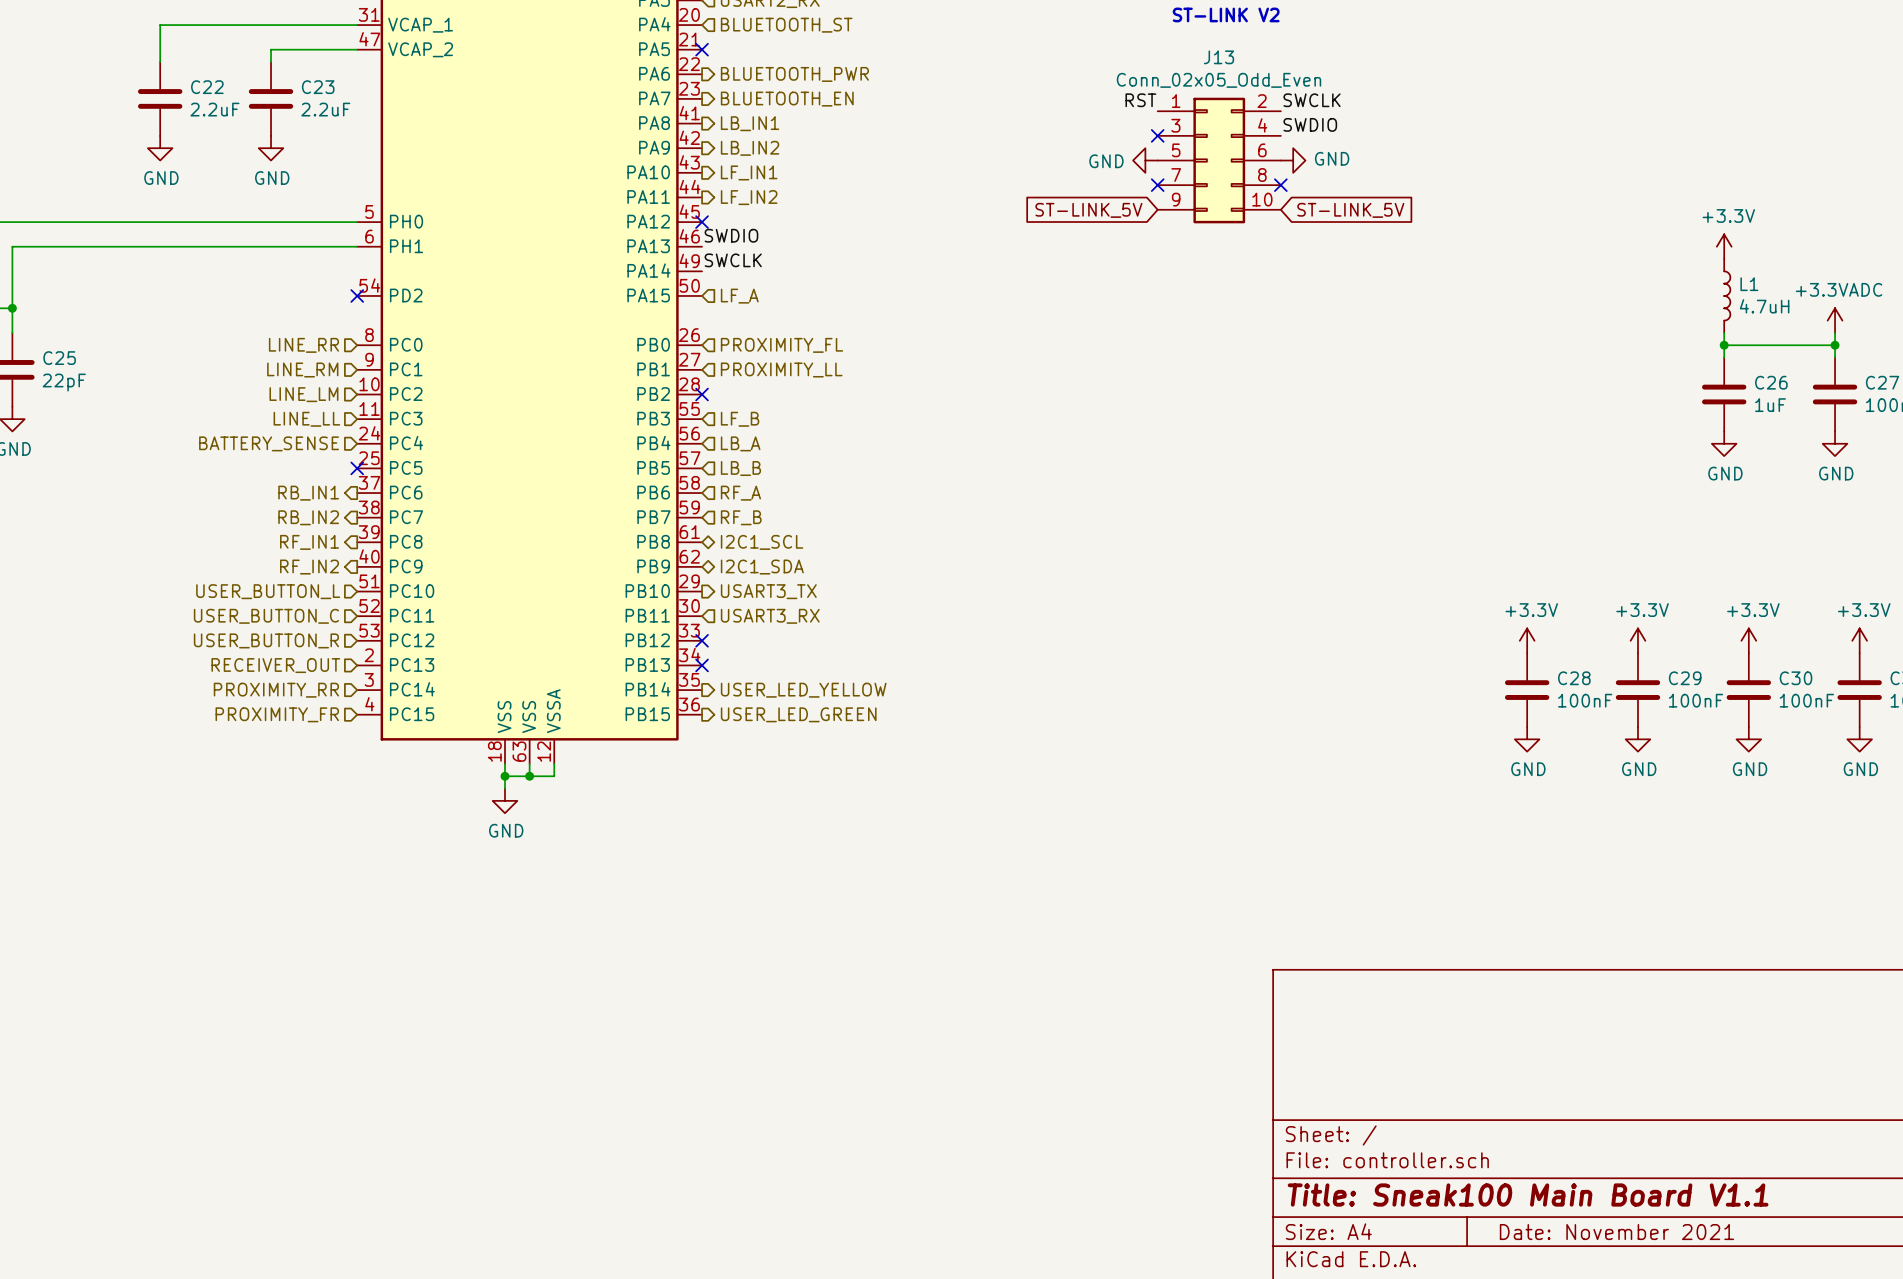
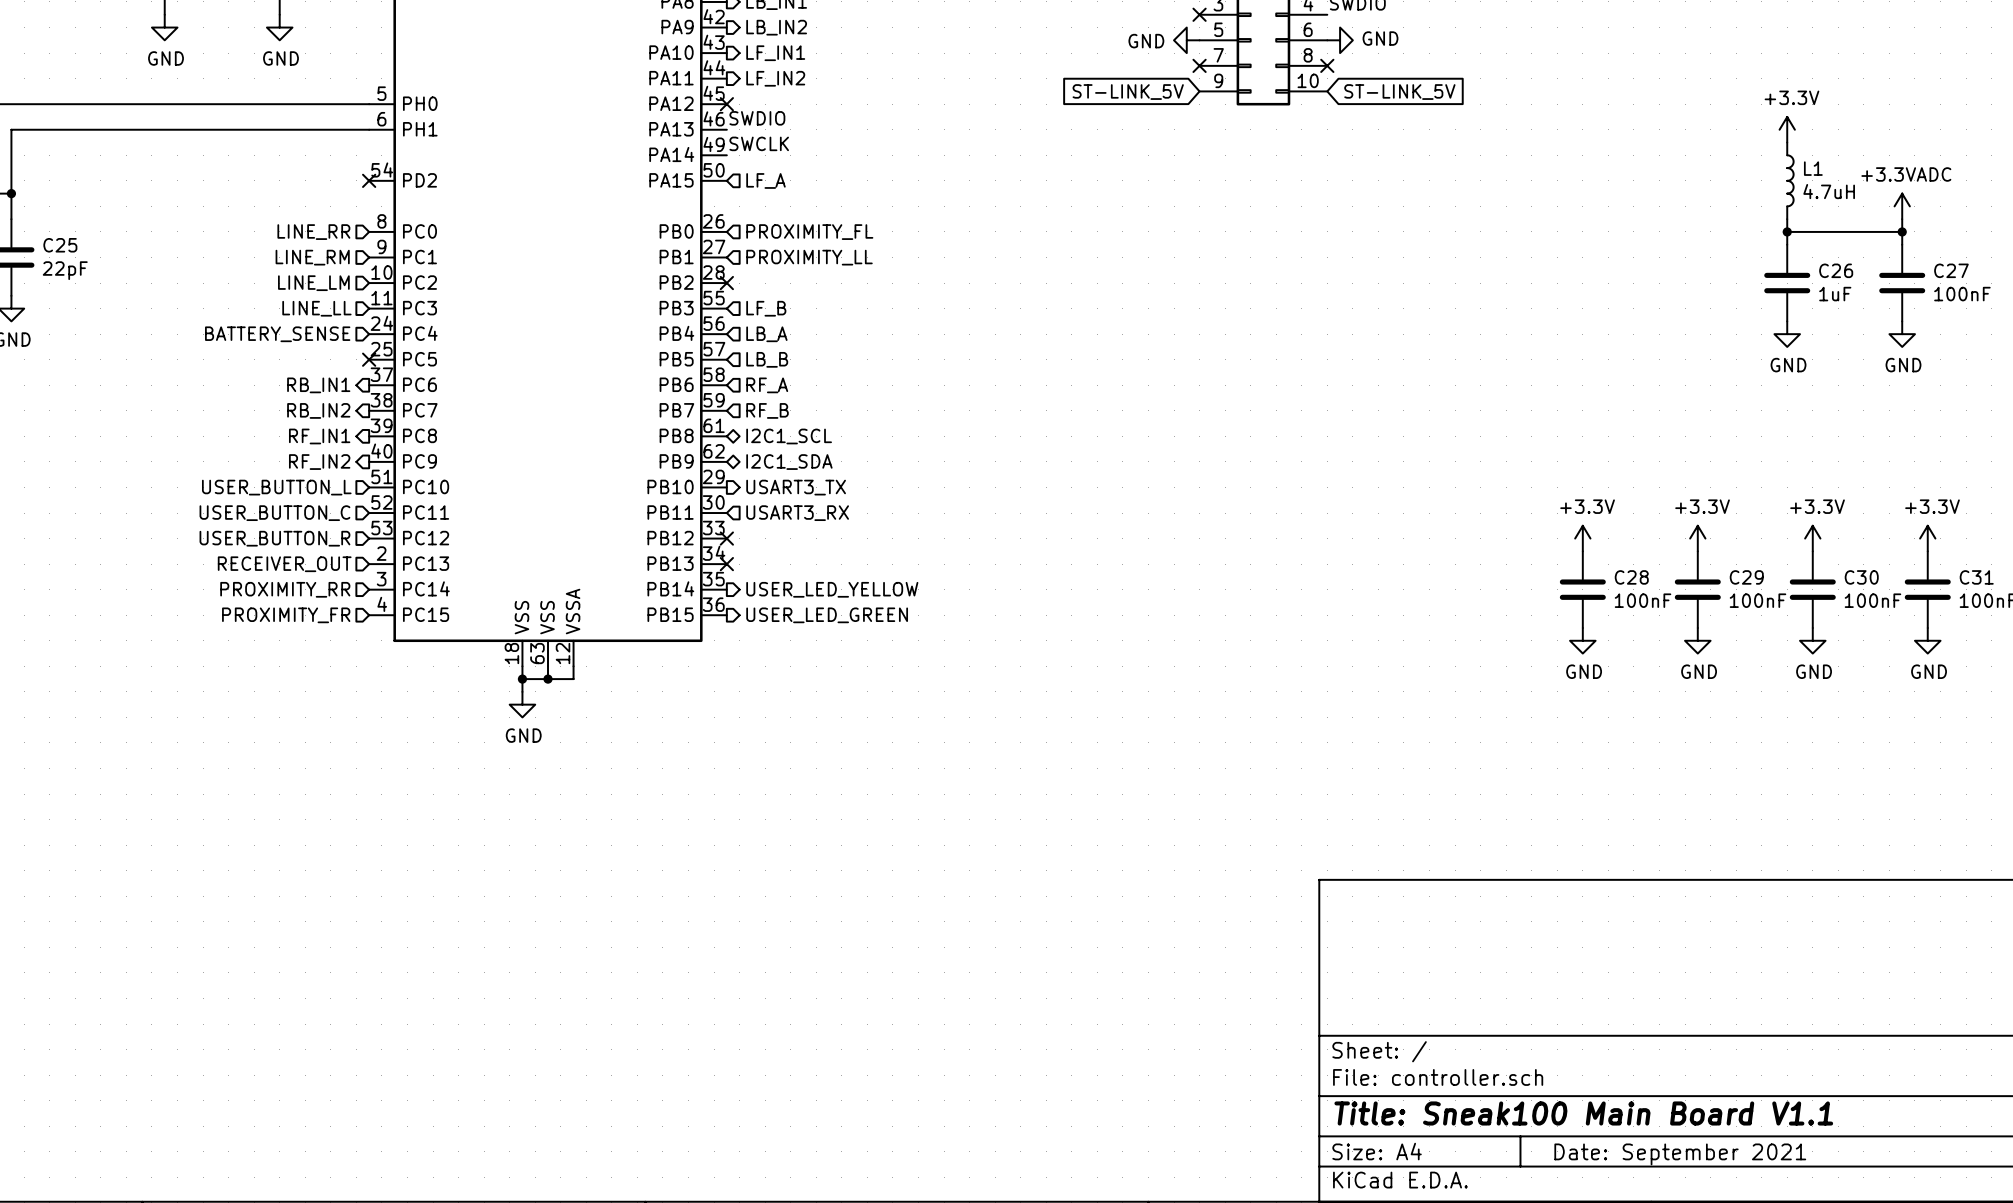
title block: Date: November 2021 (1616, 1232) -> Date: September 2021 (1680, 1154)

